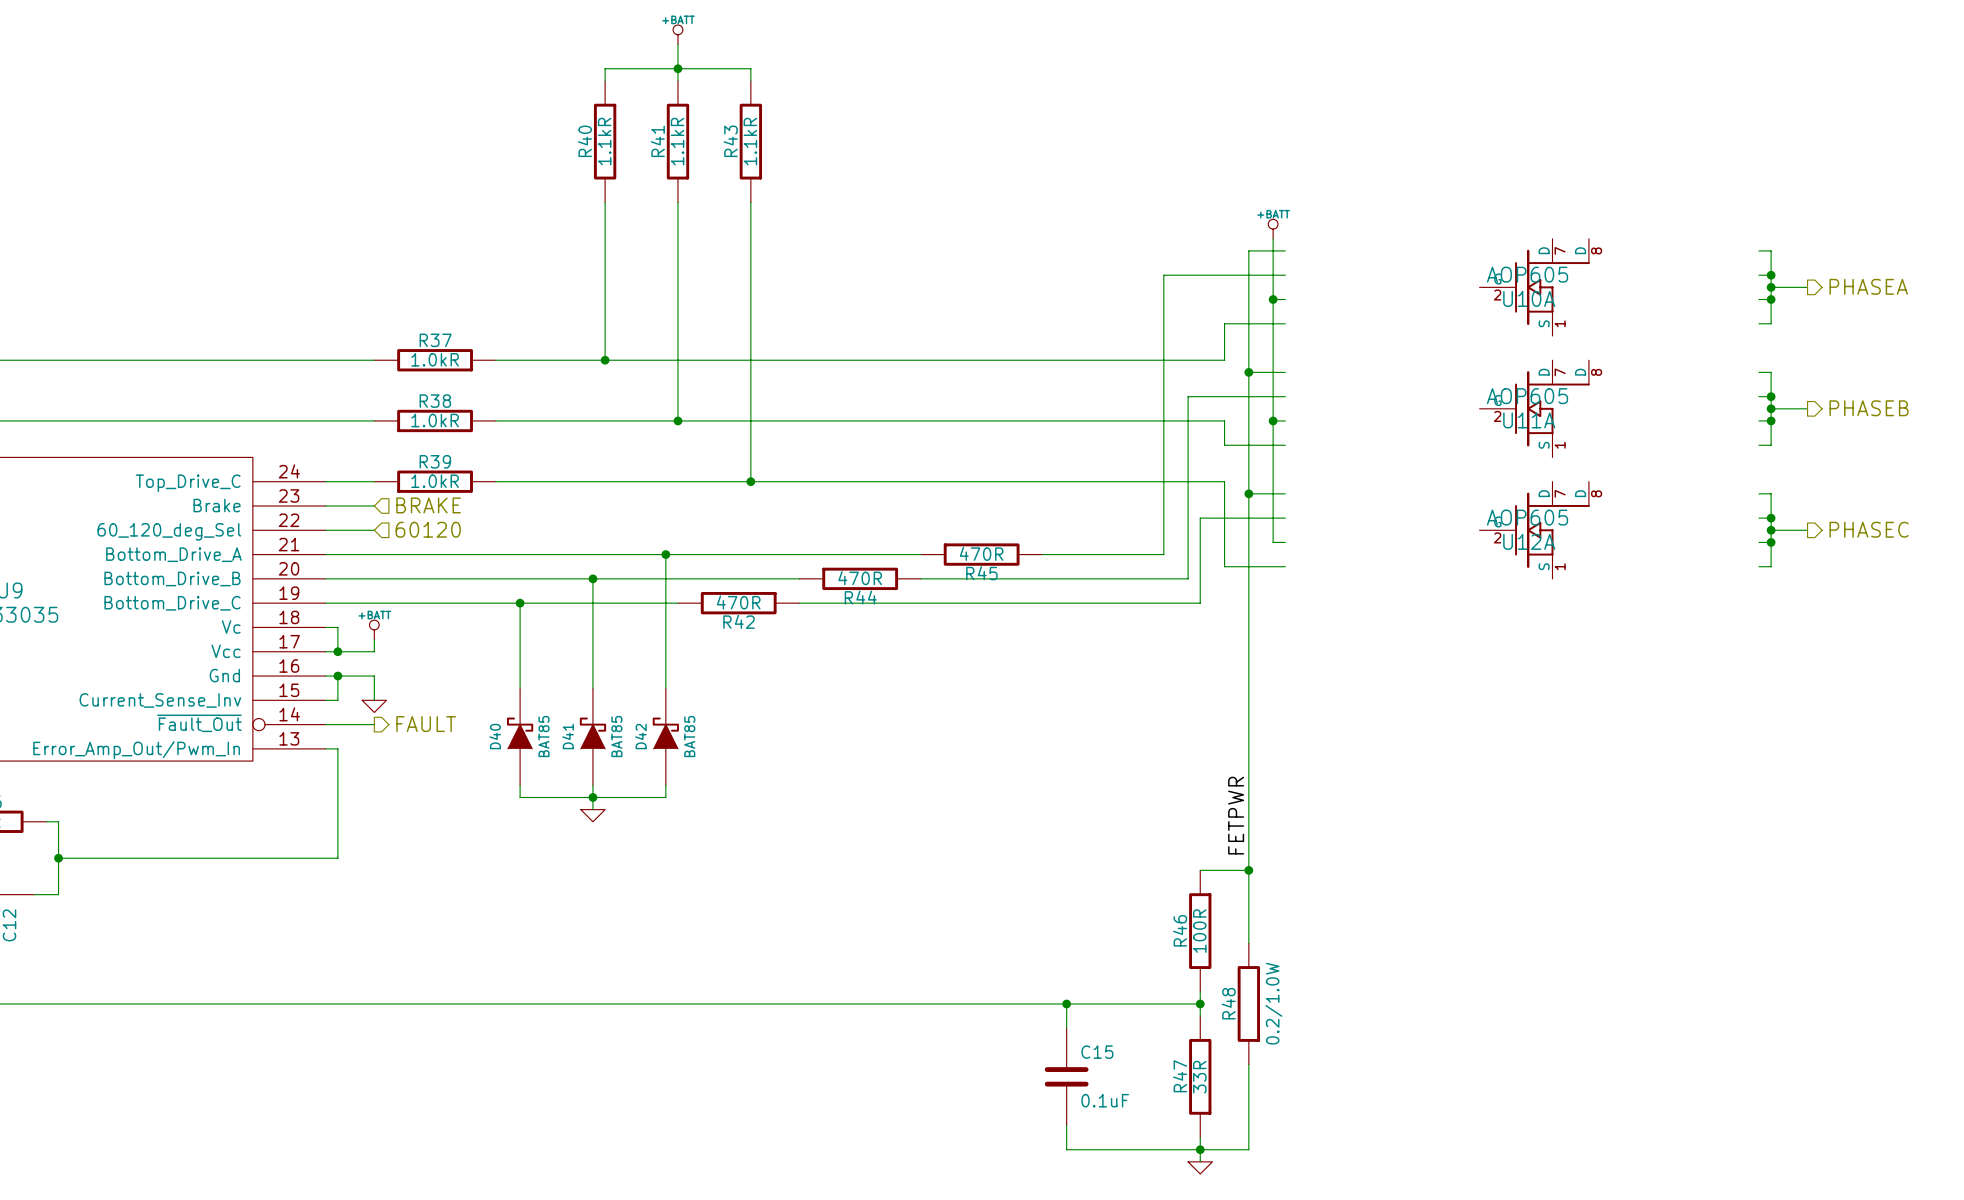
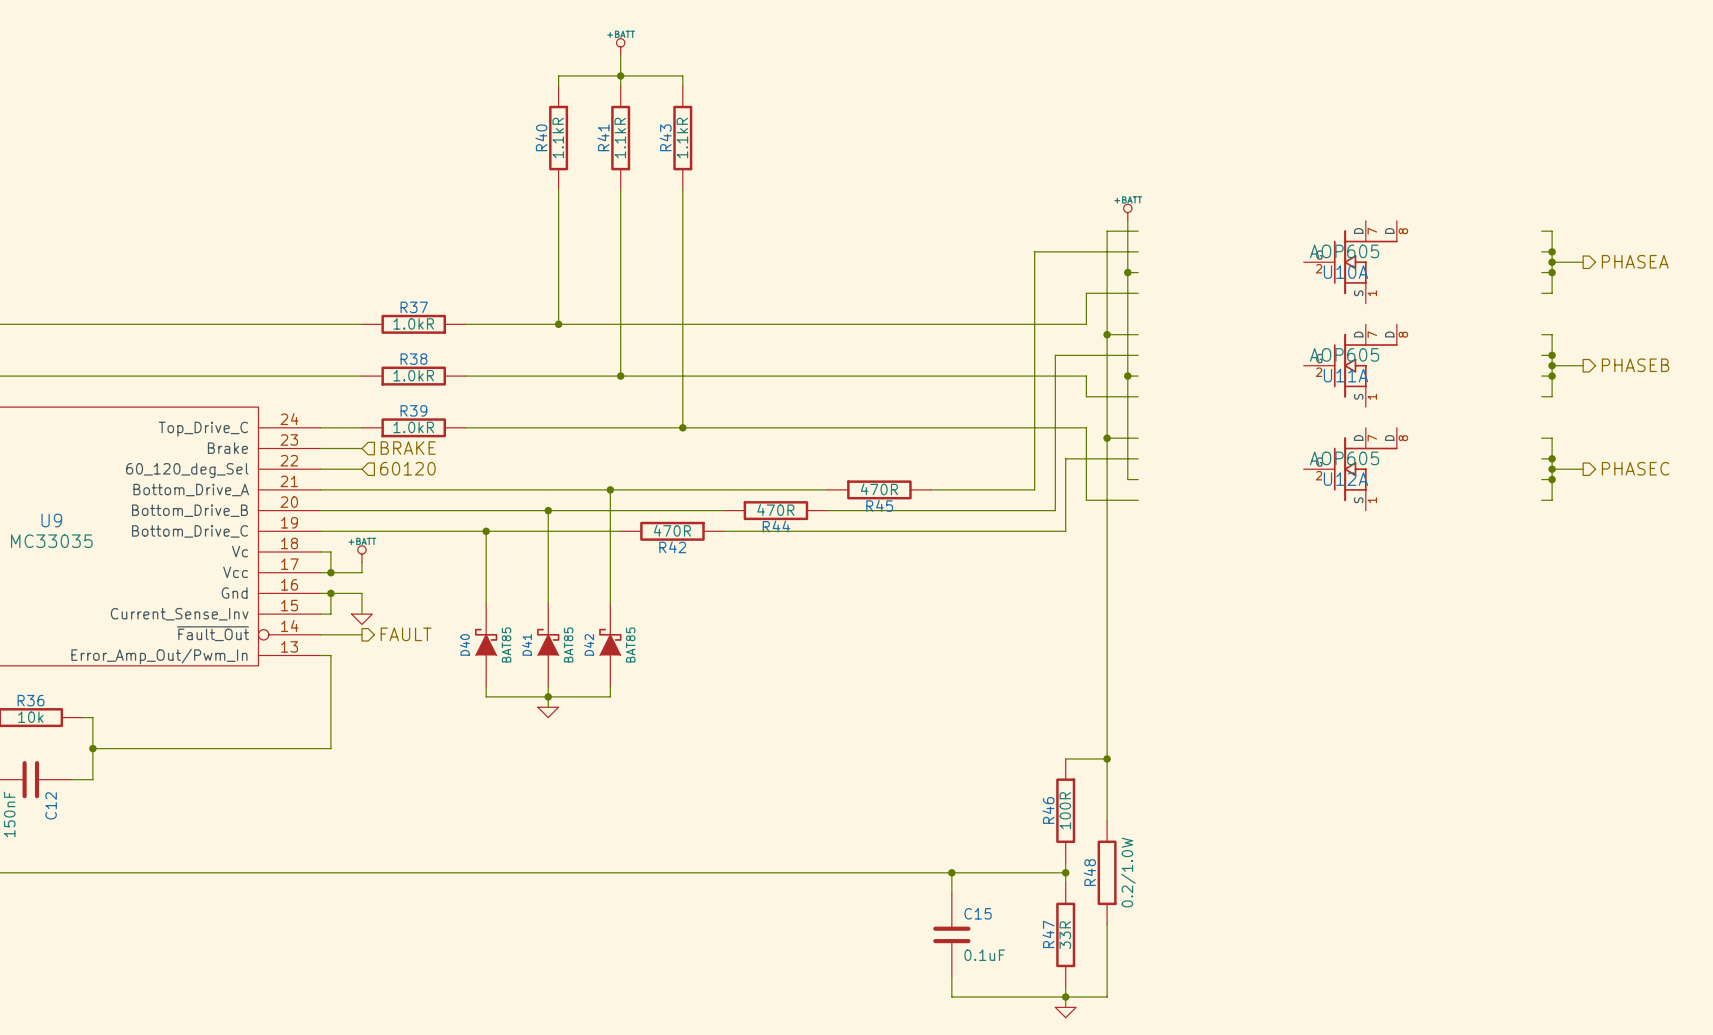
label: FETPWR (1236, 815) -> none

